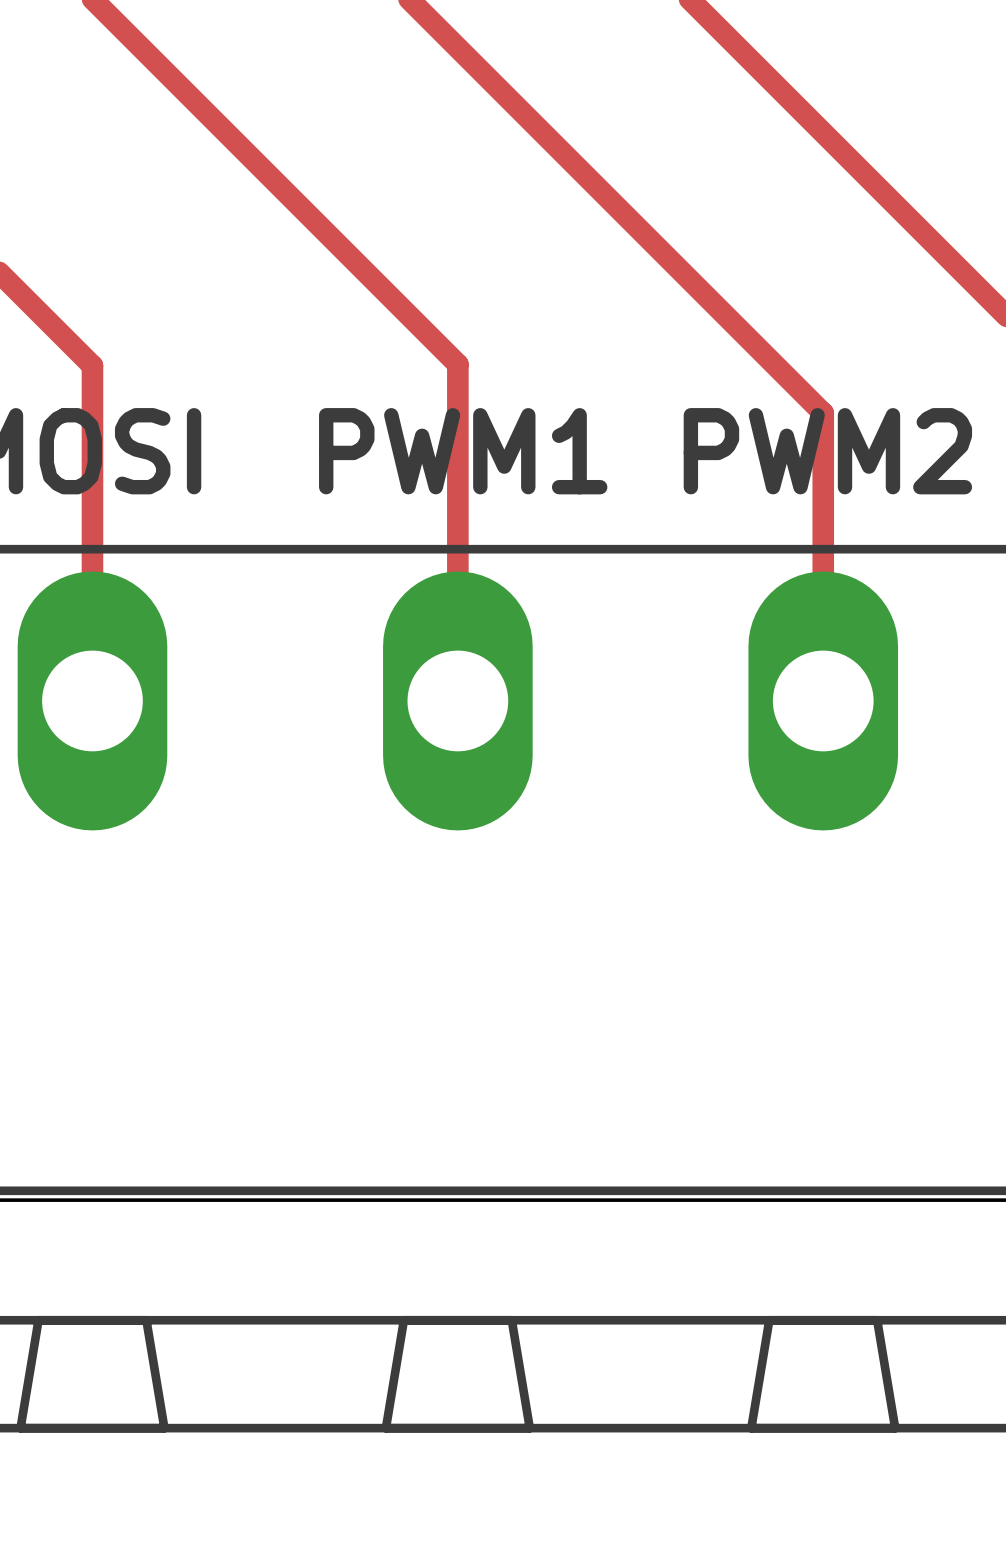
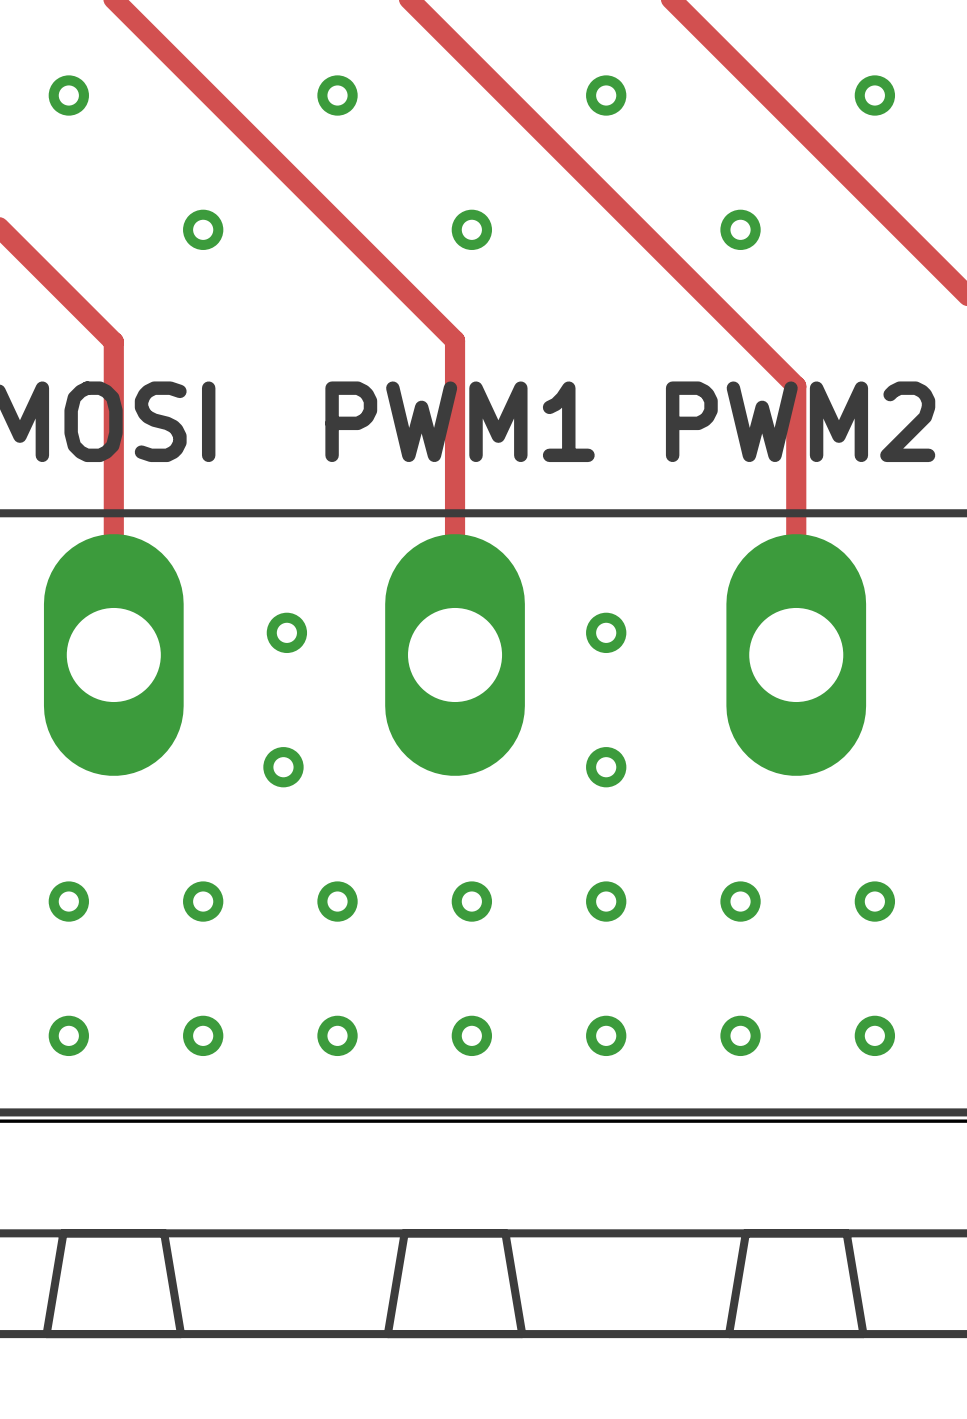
via: none -> (68, 95)
via: none -> (337, 95)
via: none -> (606, 95)
via: none -> (874, 95)
via: none -> (203, 229)
via: none -> (471, 229)
via: none -> (740, 229)
via: none -> (286, 632)
via: none -> (606, 632)
via: none -> (283, 767)
via: none -> (606, 767)
via: none -> (68, 901)
via: none -> (203, 901)
via: none -> (337, 901)
via: none -> (471, 901)
via: none -> (606, 901)
via: none -> (740, 901)
via: none -> (874, 901)
via: none -> (68, 1035)
via: none -> (203, 1035)
via: none -> (337, 1035)
via: none -> (471, 1035)
via: none -> (606, 1035)
via: none -> (740, 1035)
via: none -> (874, 1035)

